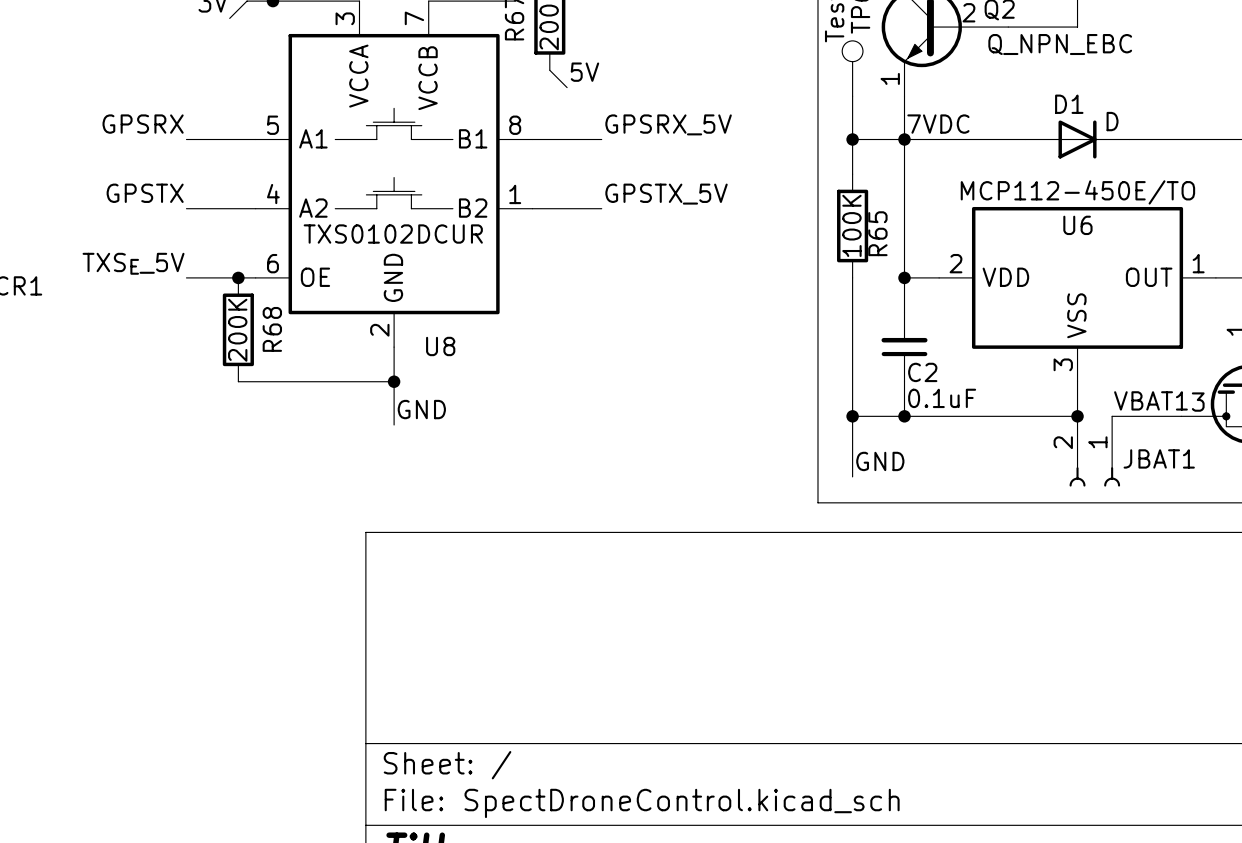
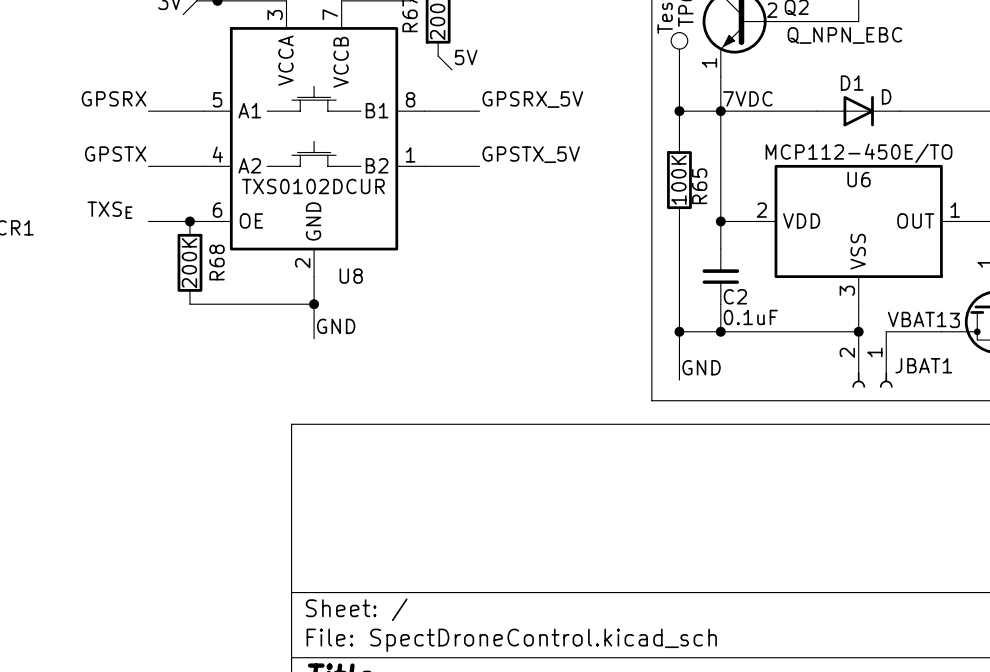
label: TXSE_5V (133, 263) -> TXSE (109, 210)

